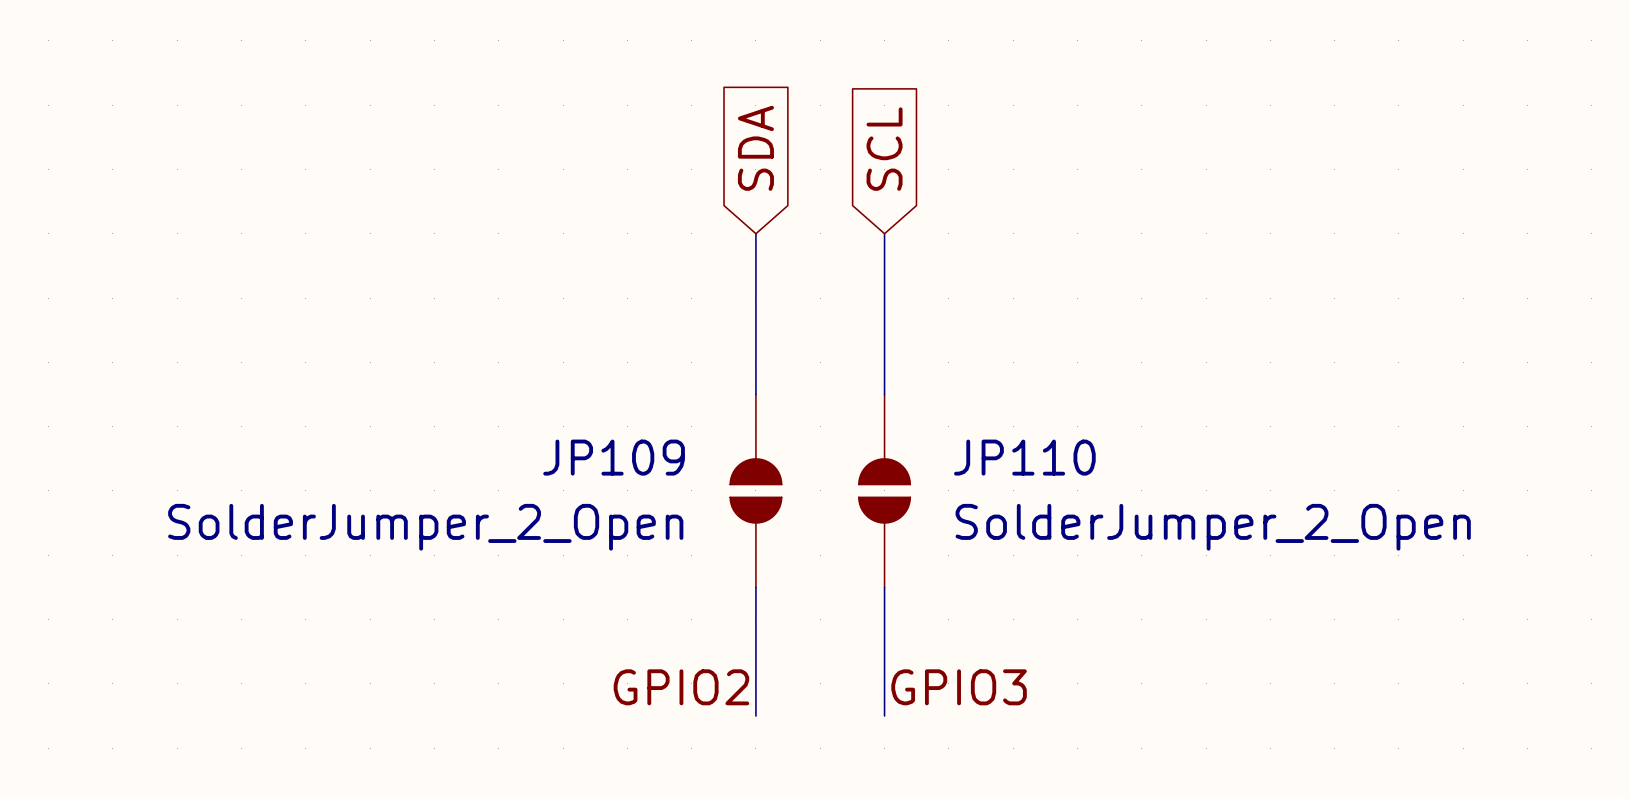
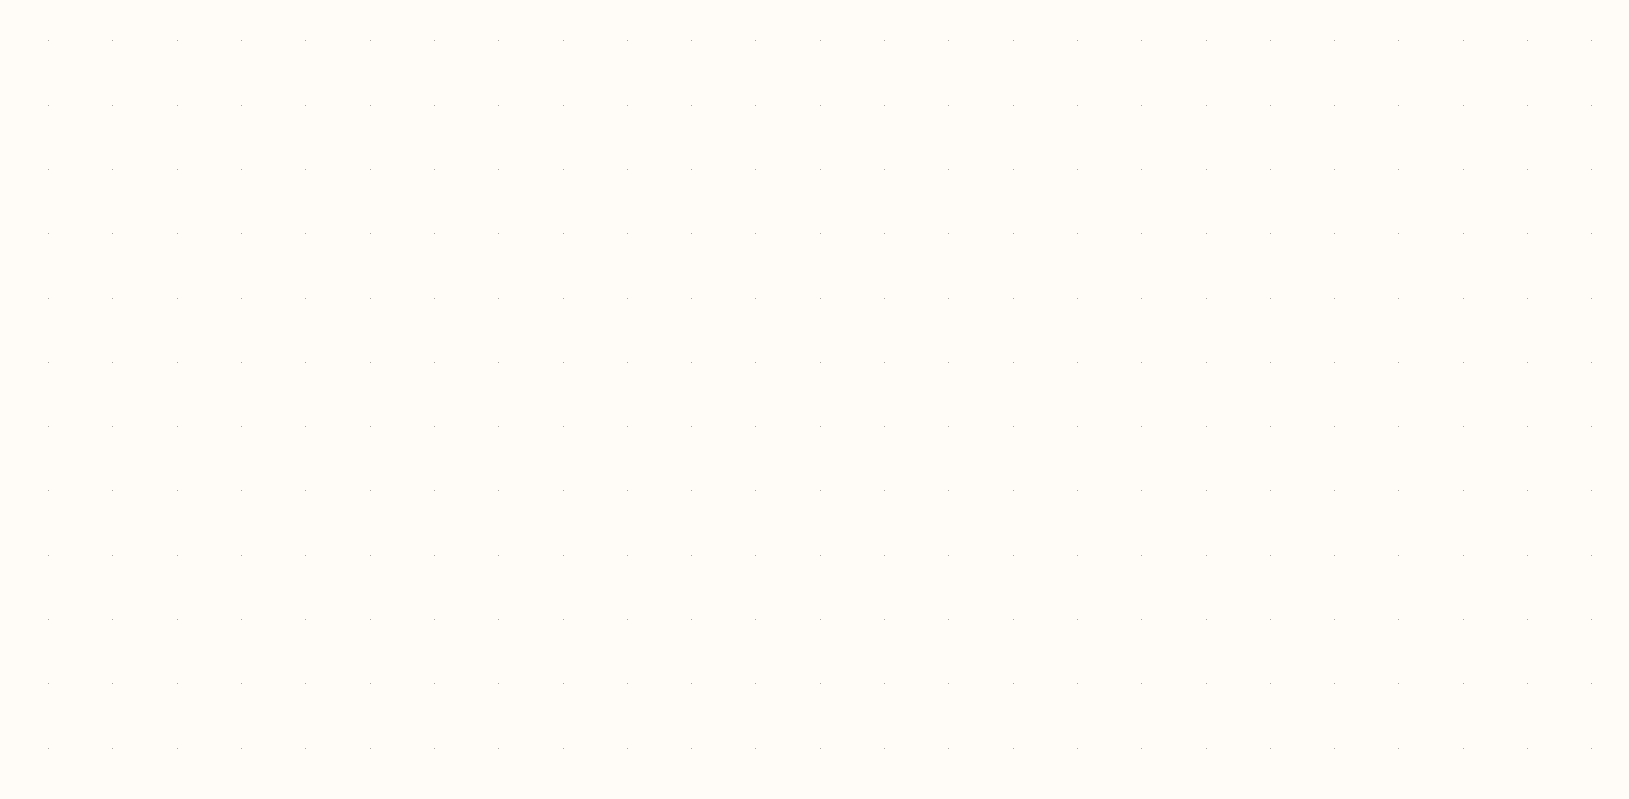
global label: SDA (755, 148) -> none
global label: SCL (884, 149) -> none
wire: (755, 233) (755, 394) -> none
wire: (884, 233) (884, 394) -> none
JP109: SolderJumper_2_Open (755, 490) -> none
JP110: SolderJumper_2_Open (884, 490) -> none
wire: (755, 587) (755, 716) -> none
wire: (884, 587) (884, 716) -> none
label: GPIO2 (681, 687) -> none
label: GPIO3 (959, 687) -> none

